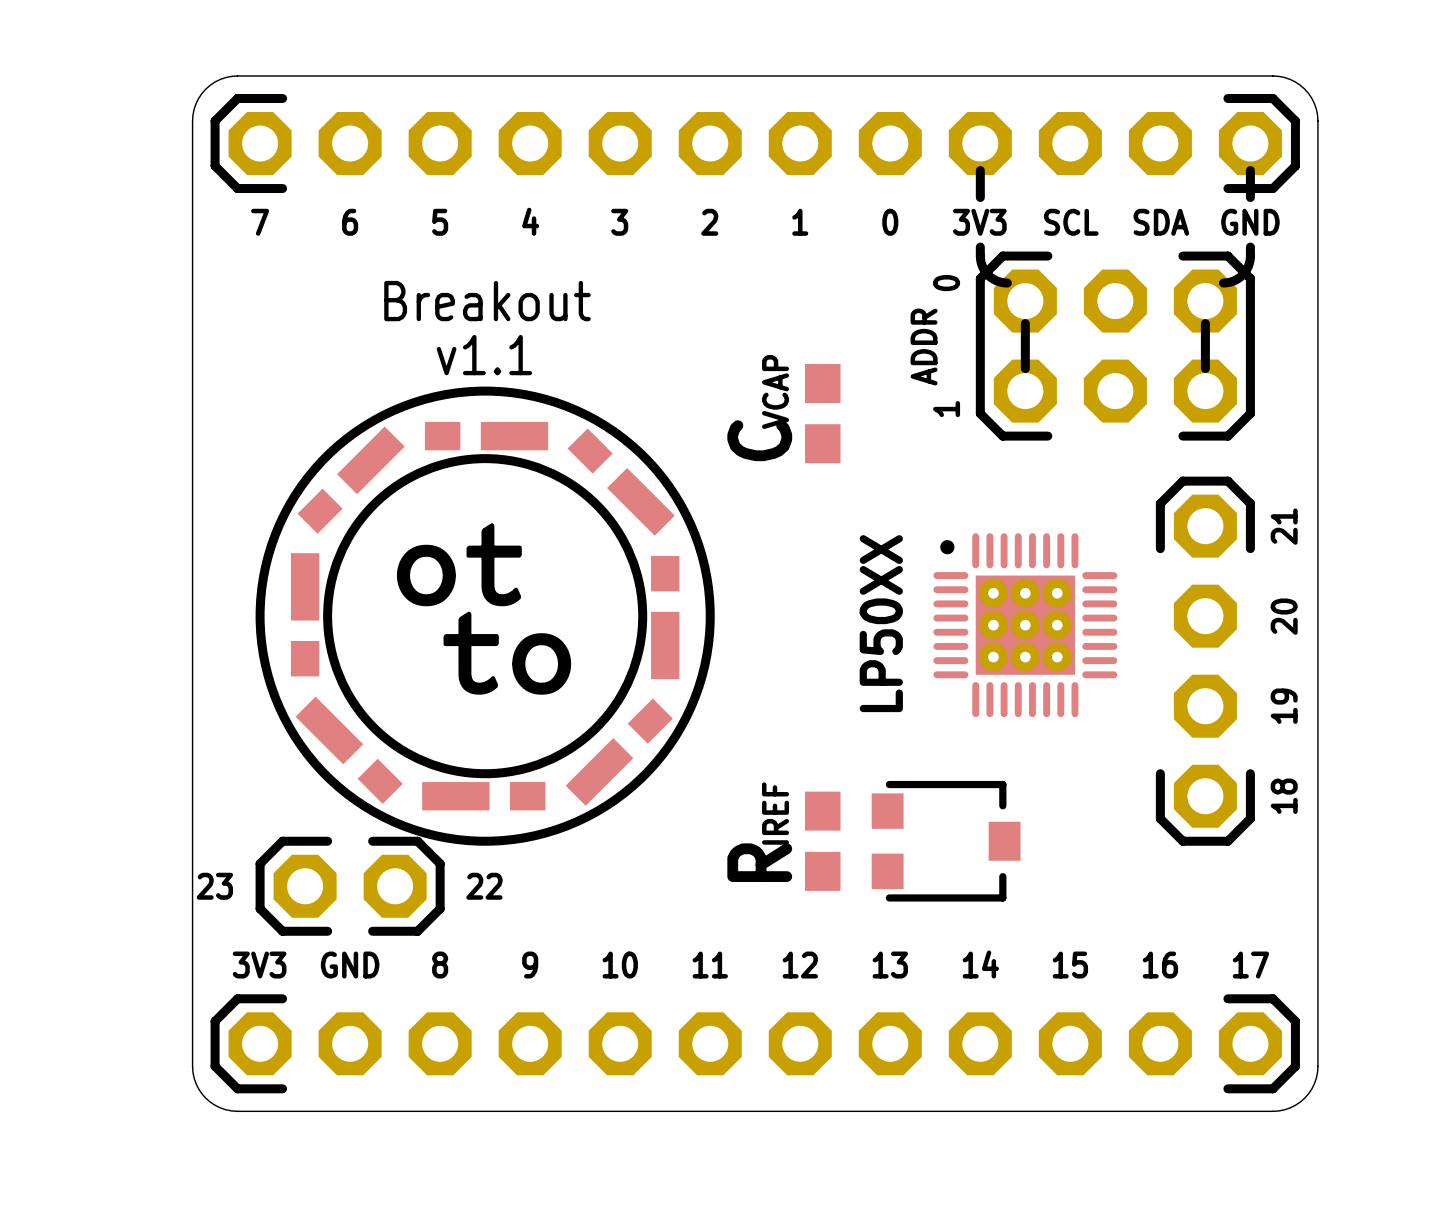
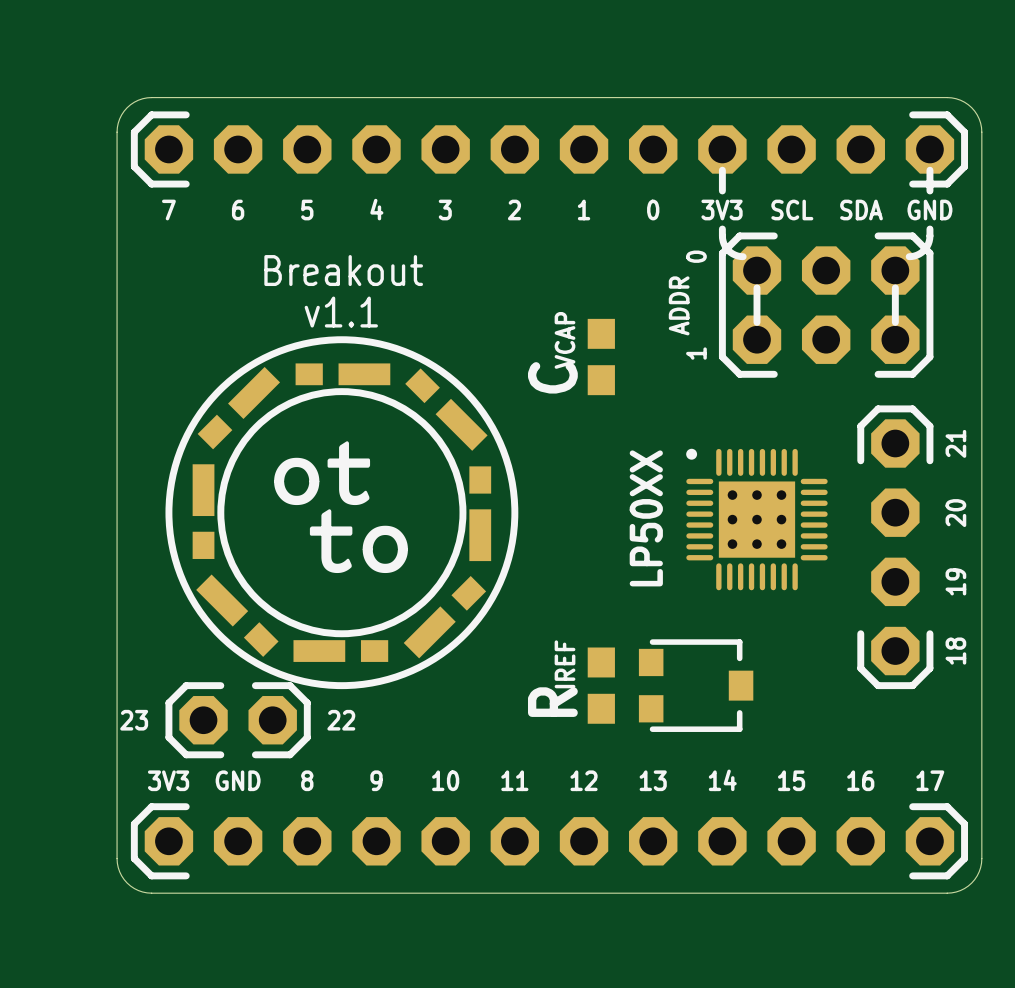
part footprint: [933, 533, 1118, 718] -> [686, 448, 828, 591]

